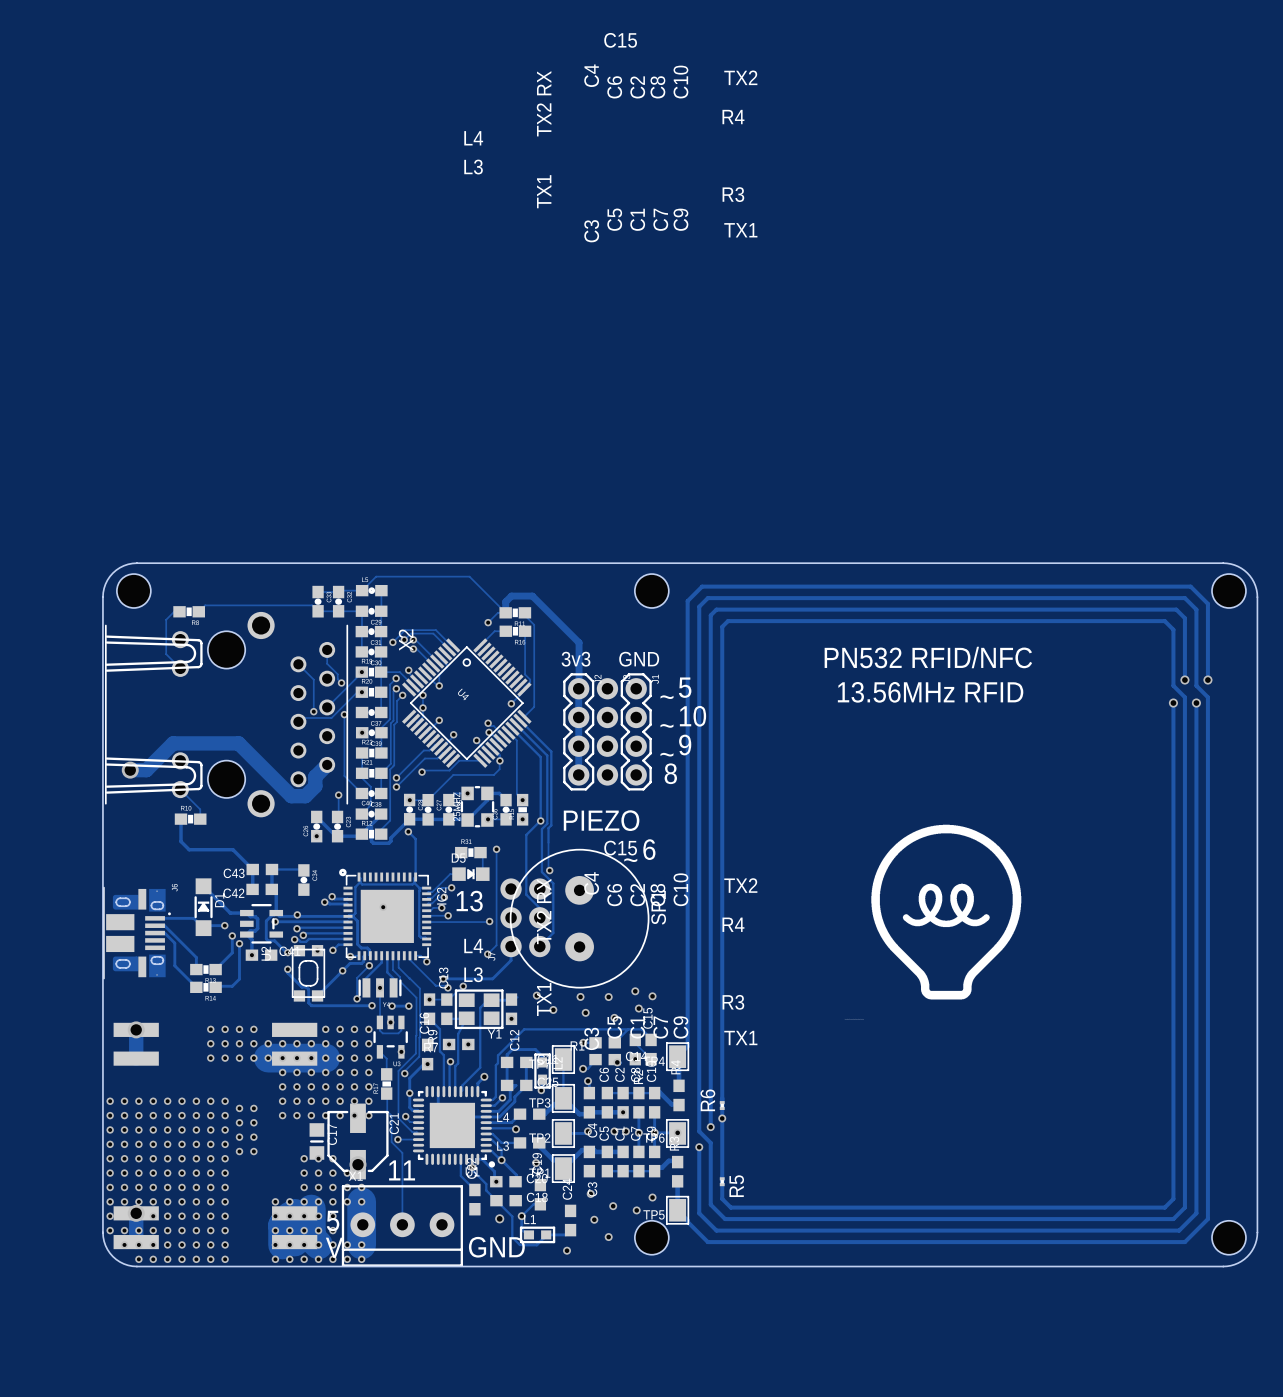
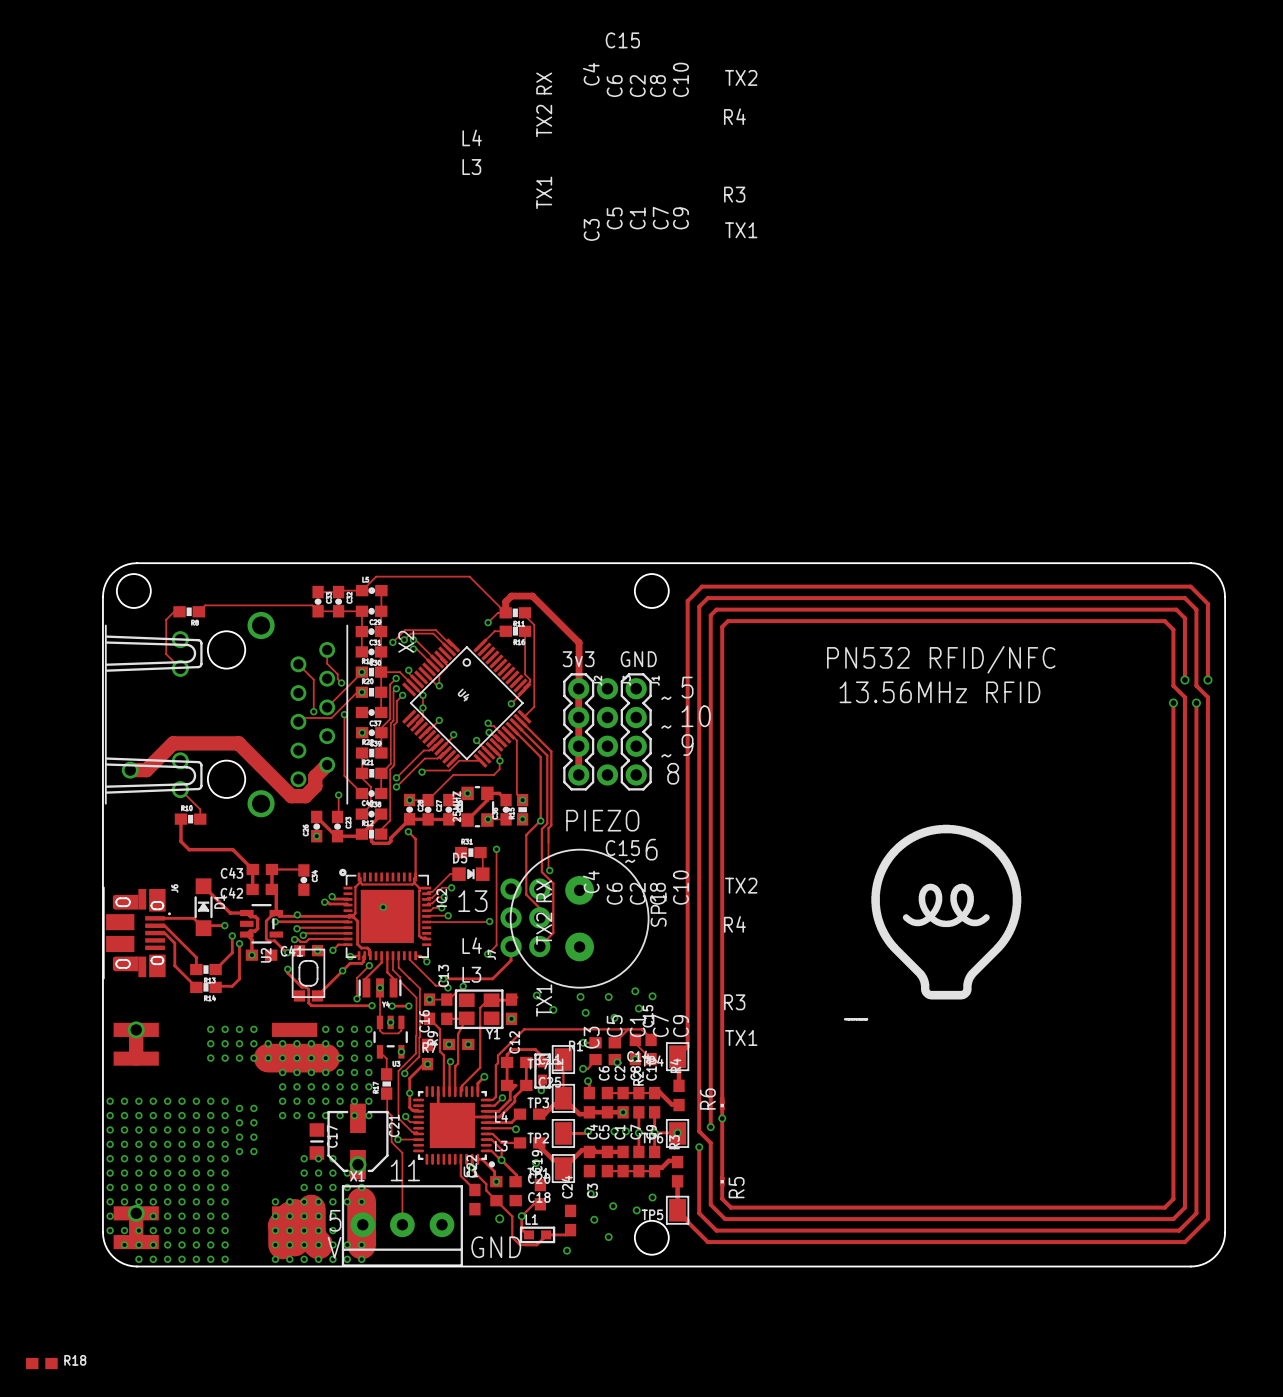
board edge: (1190, 563) (1227, 563) (1238, 566) (1252, 579) (1257, 597) (1257, 1236) (1252, 1250) (1238, 1263) (1227, 1266) (1190, 1266) -> (1190, 563) (1205, 566) (1215, 573) (1223, 585) (1225, 597) (1225, 1232) (1223, 1243) (1215, 1256) (1205, 1263) (1190, 1266)
hole: (1228, 591) -> none
hole: (1228, 1237) -> none
R18: none -> (41, 1363)

